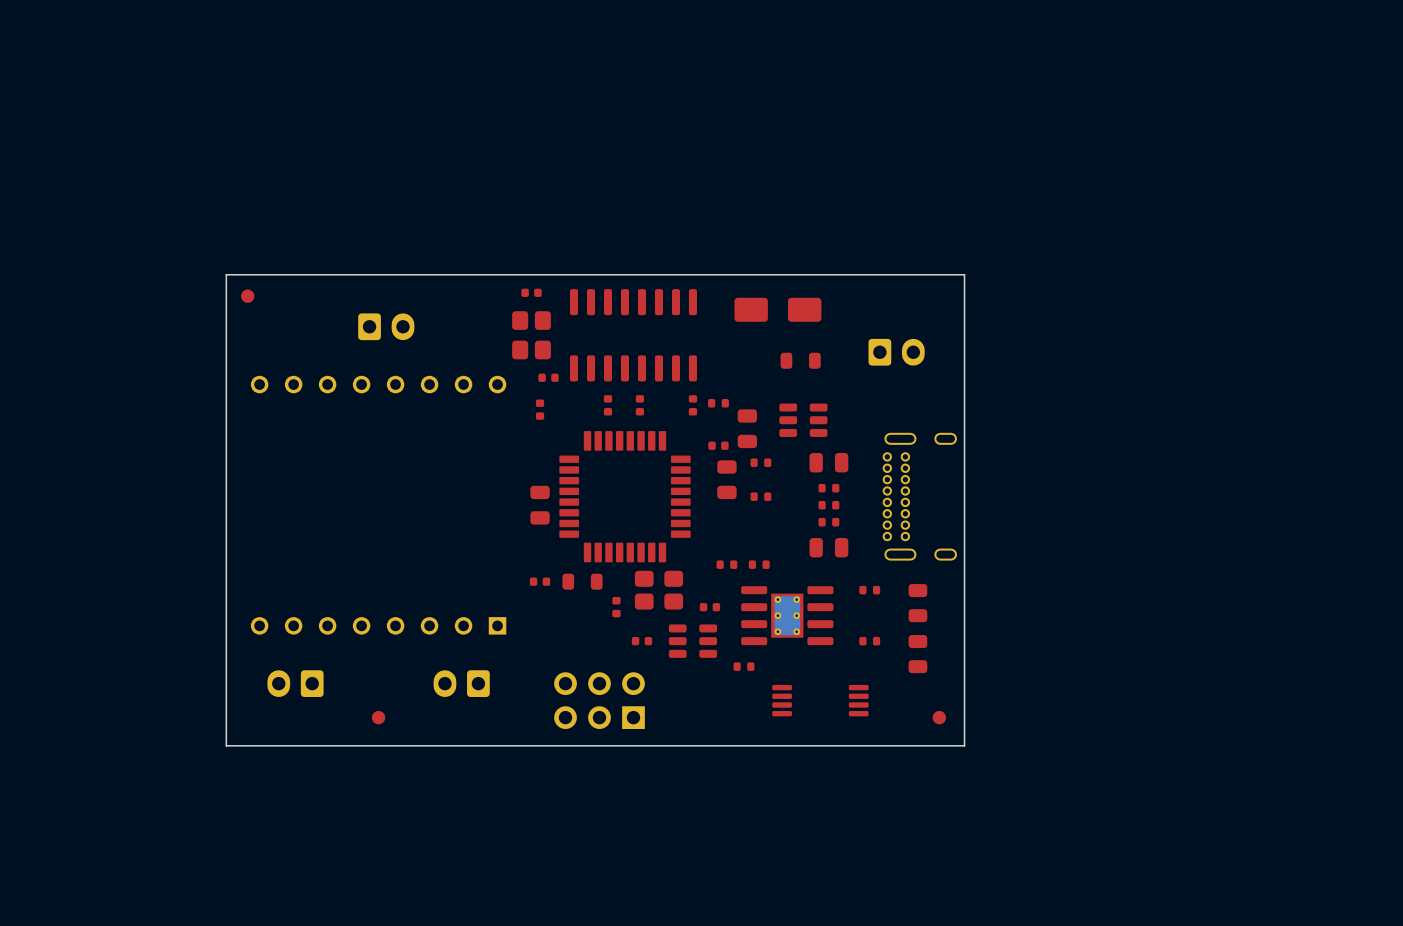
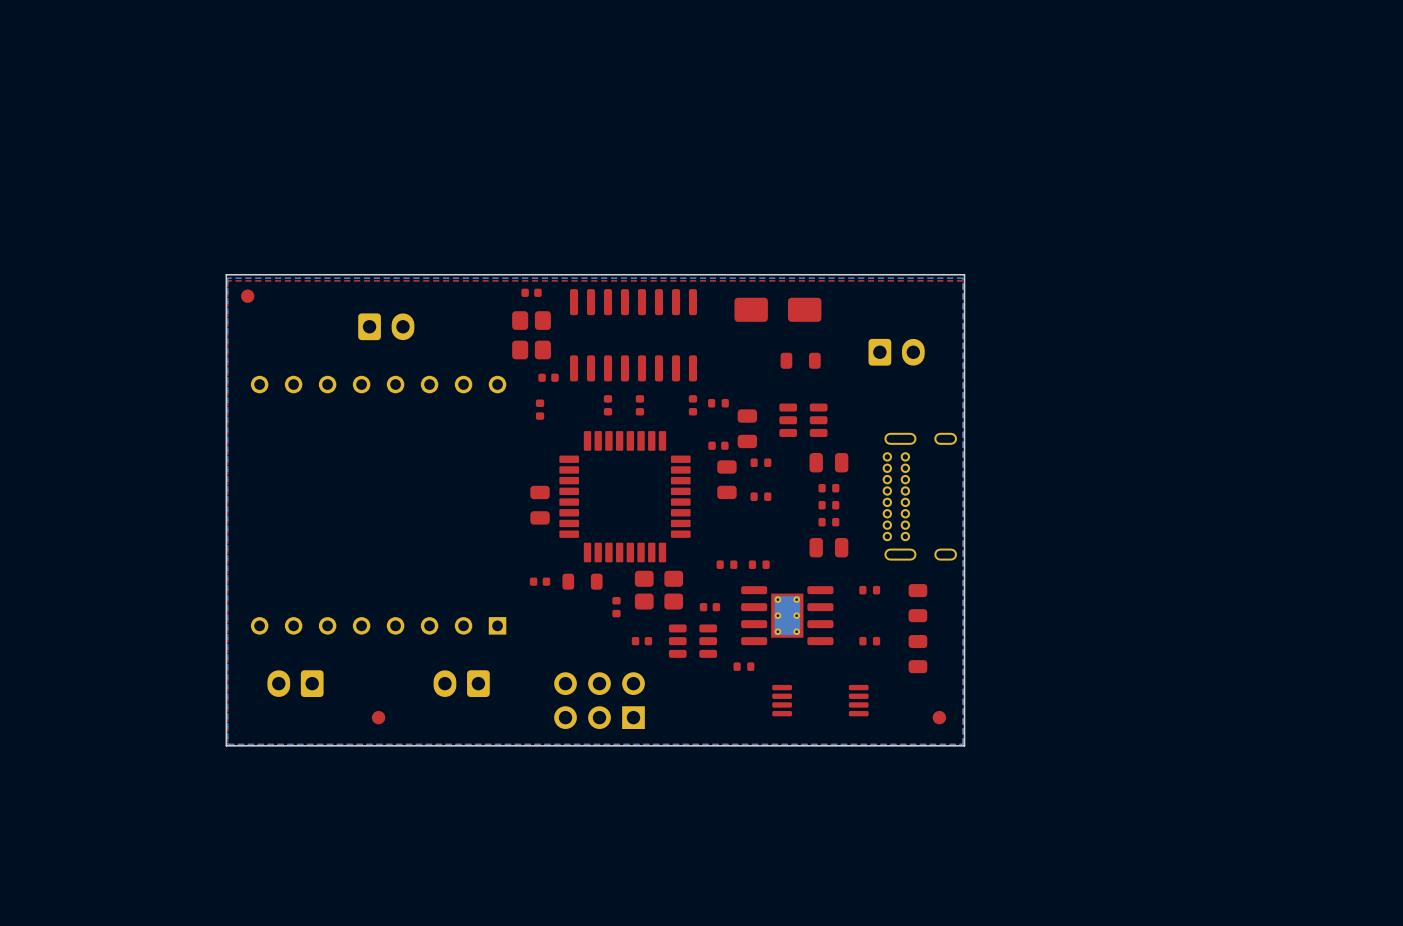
bottom zone outline: none -> (963, 278) (963, 744) (227, 743) (227, 278) (963, 278)
top zone outline: none -> (963, 280) (962, 744) (227, 744) (228, 280) (963, 280)

